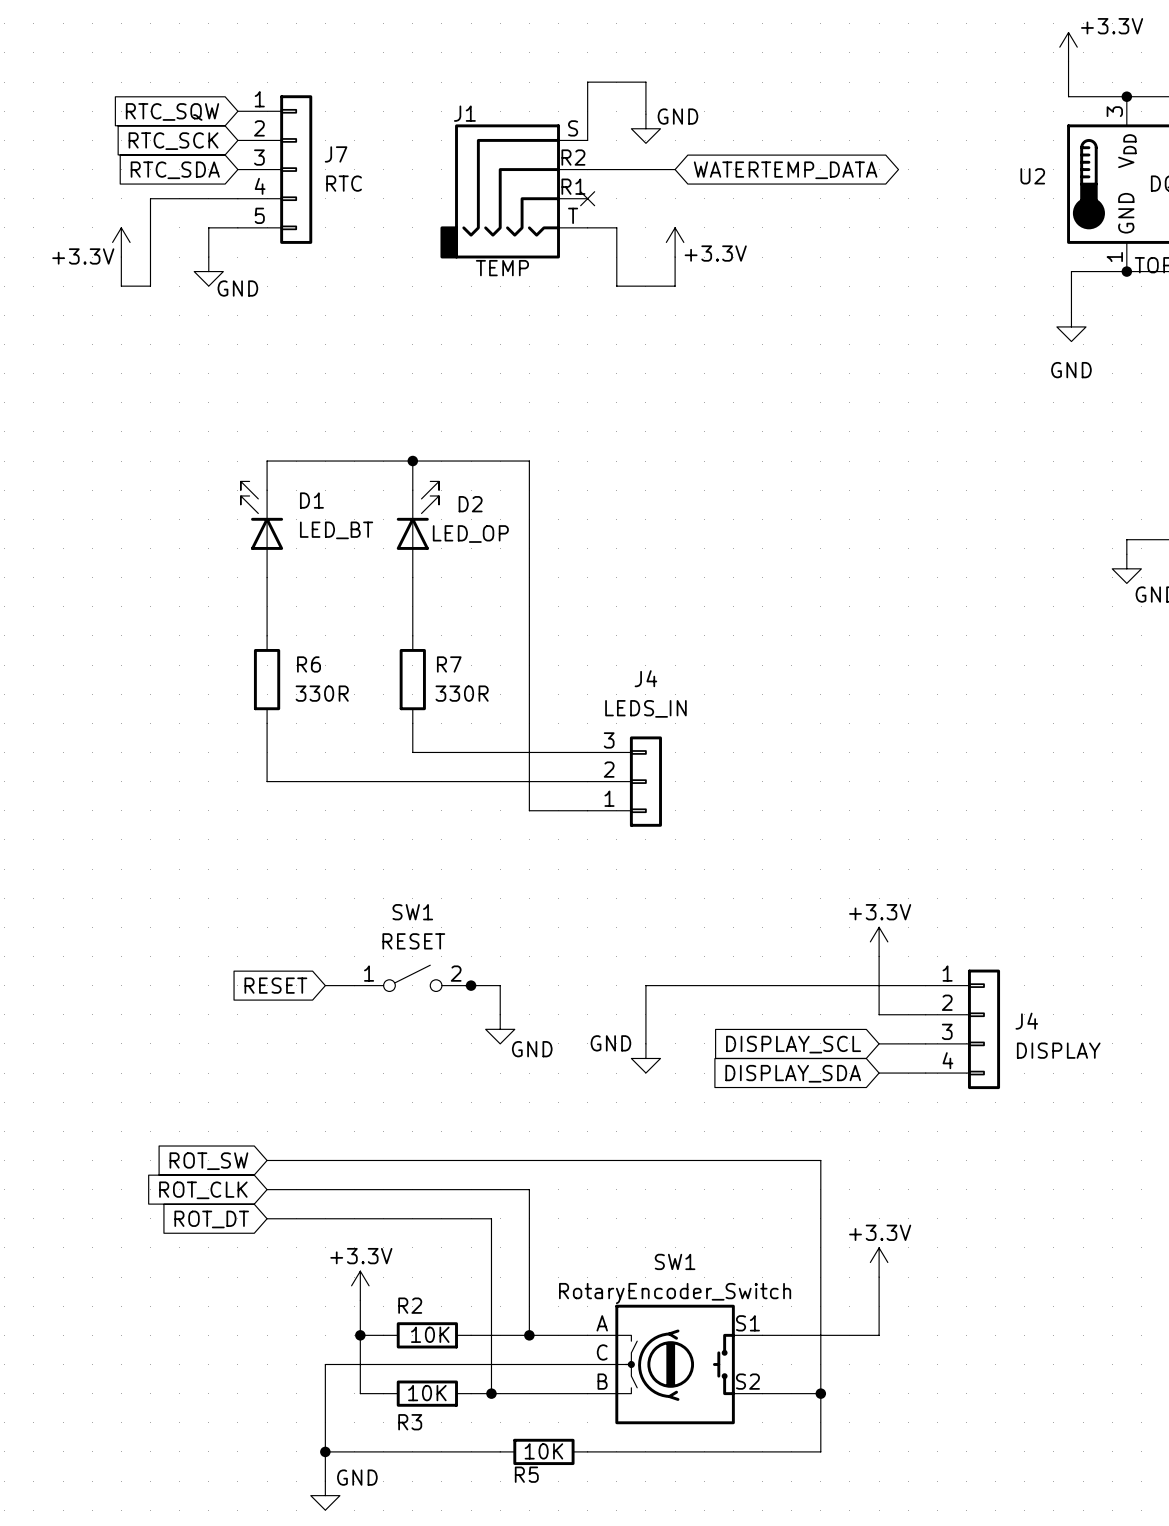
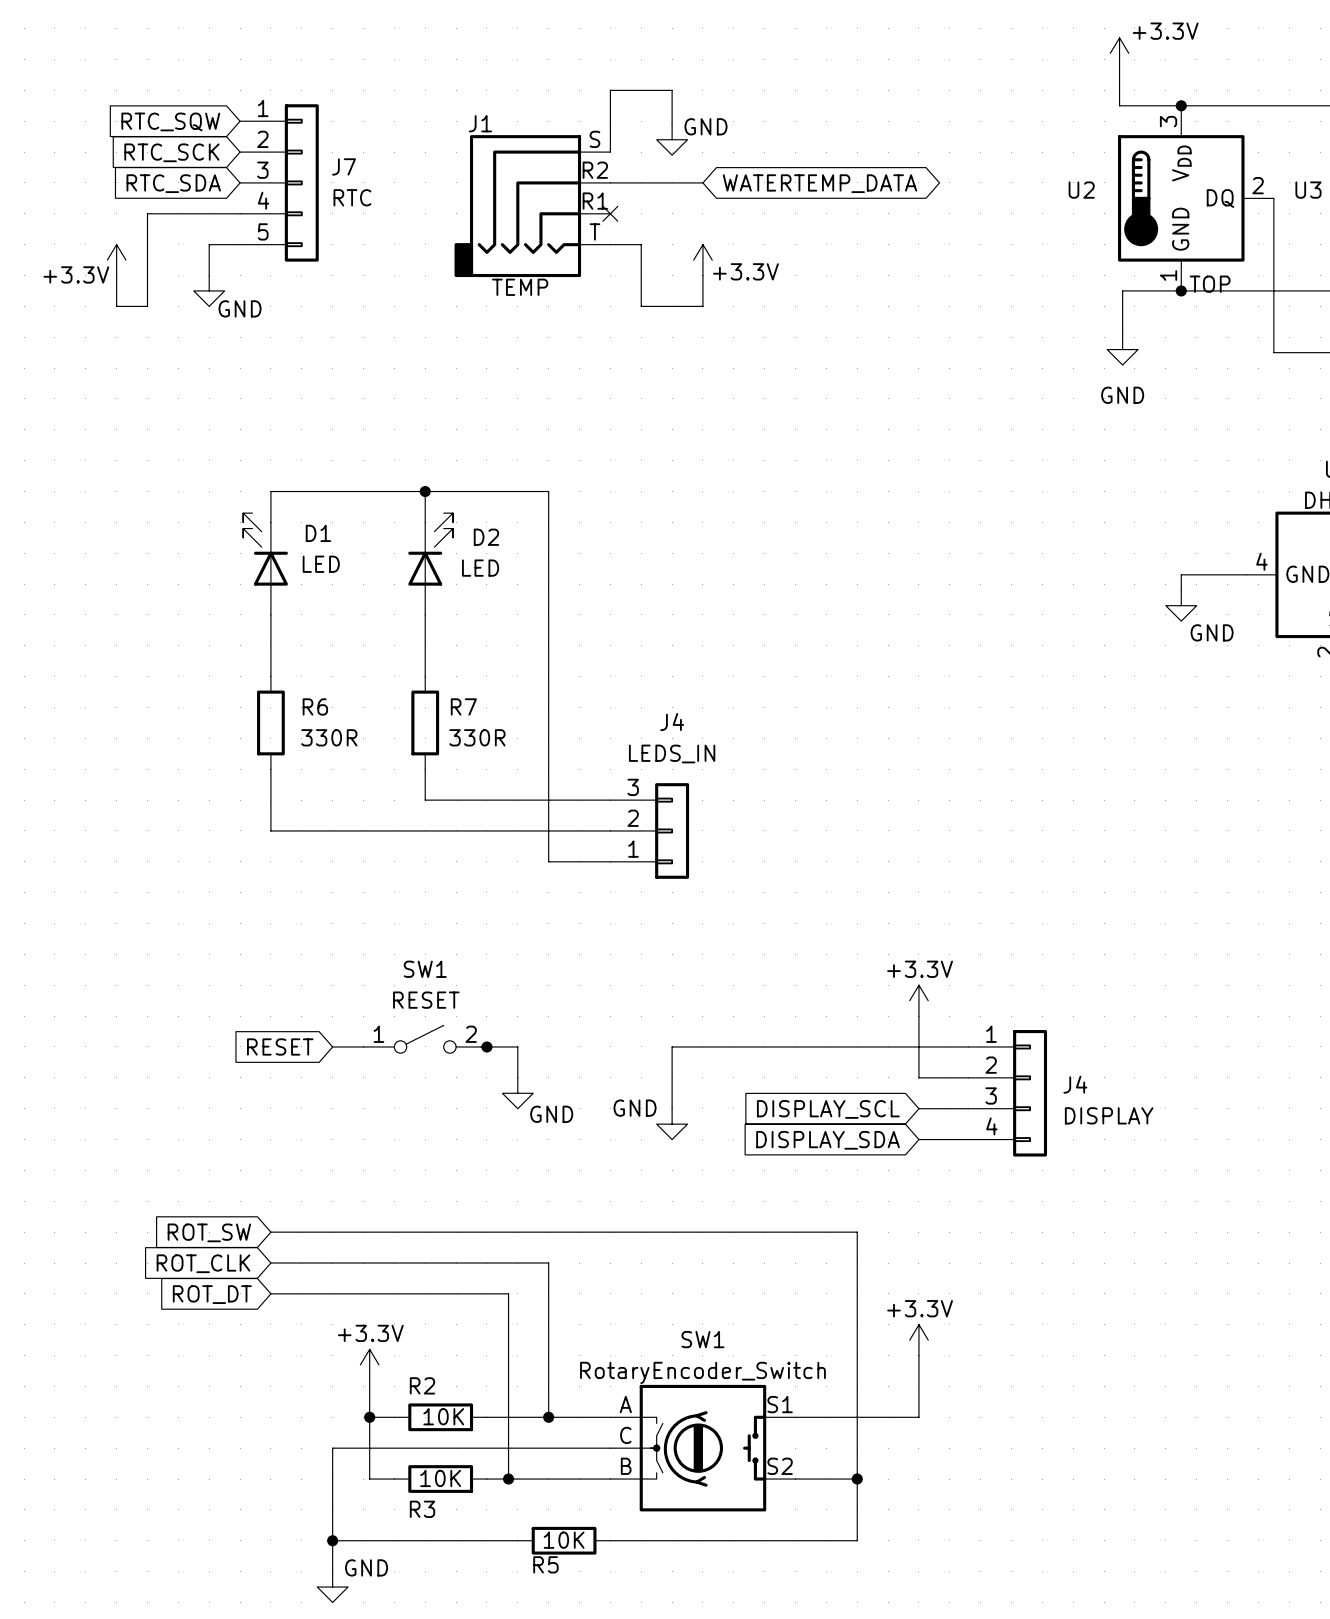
D1 value: LED_BT (336, 530) -> LED (321, 564)
D2 value: LED_OP (470, 534) -> LED (480, 568)

